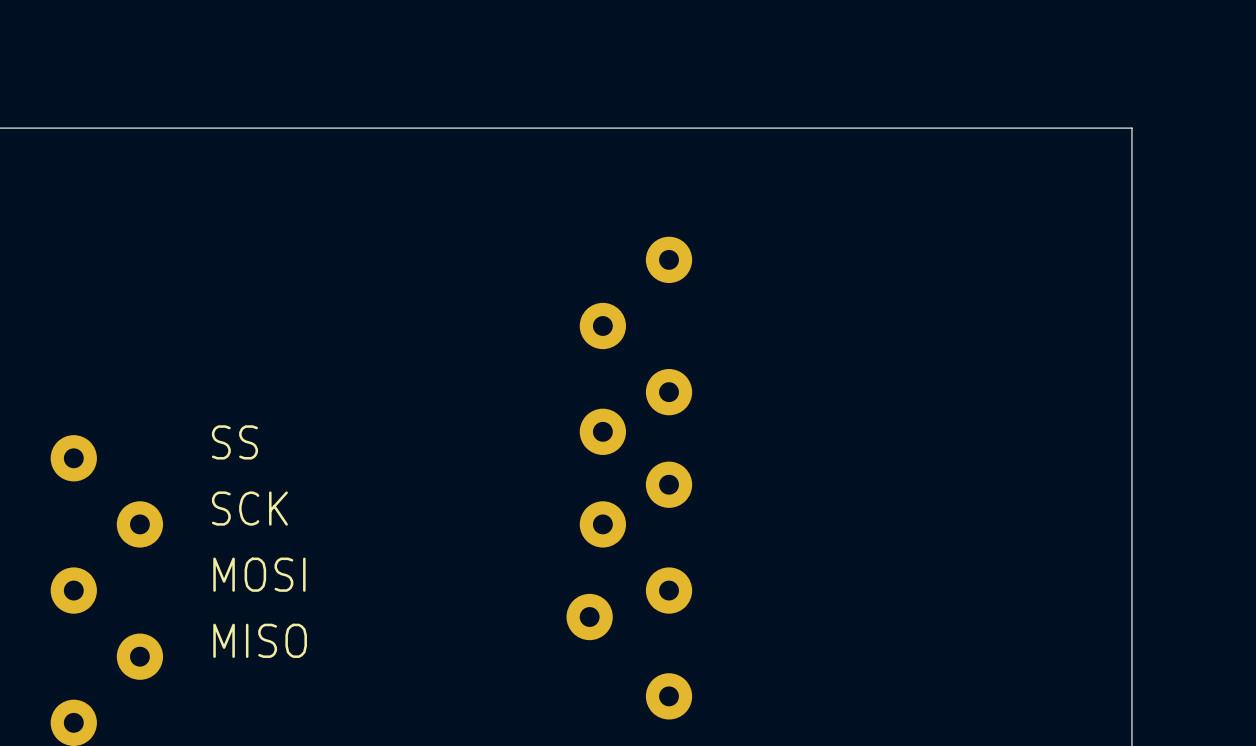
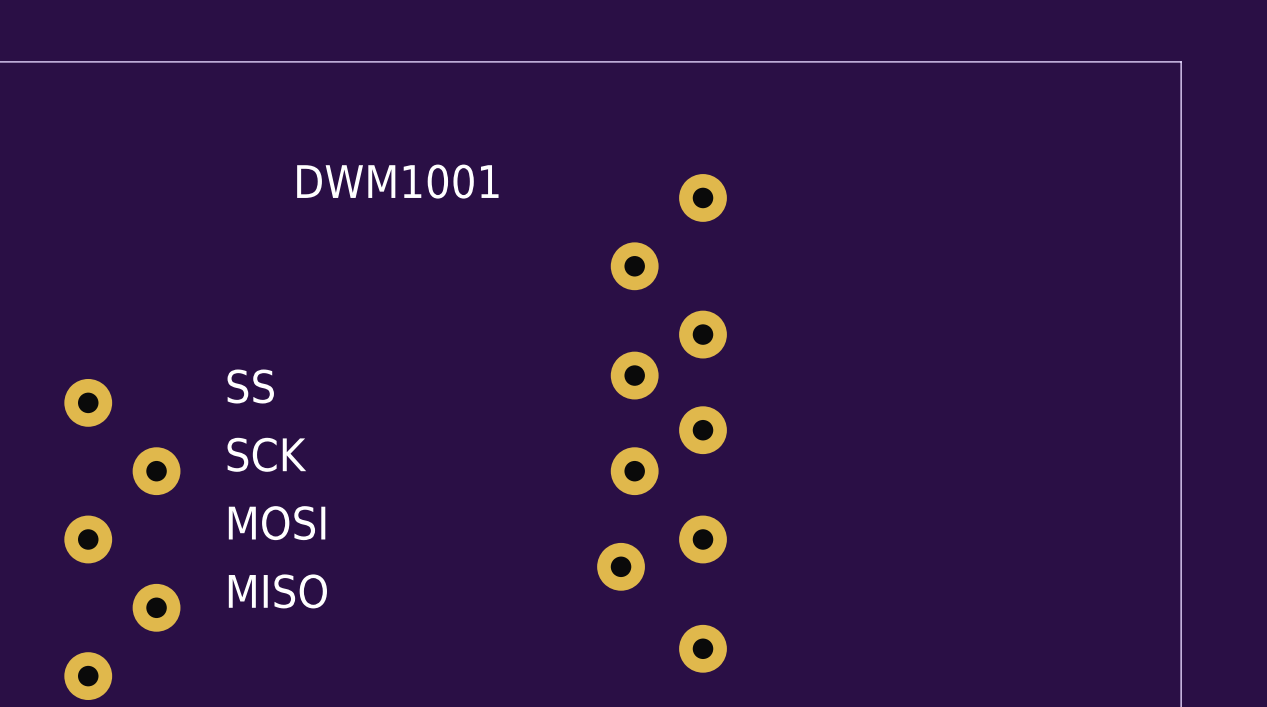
text: none -> DWM1001 (397, 181)

